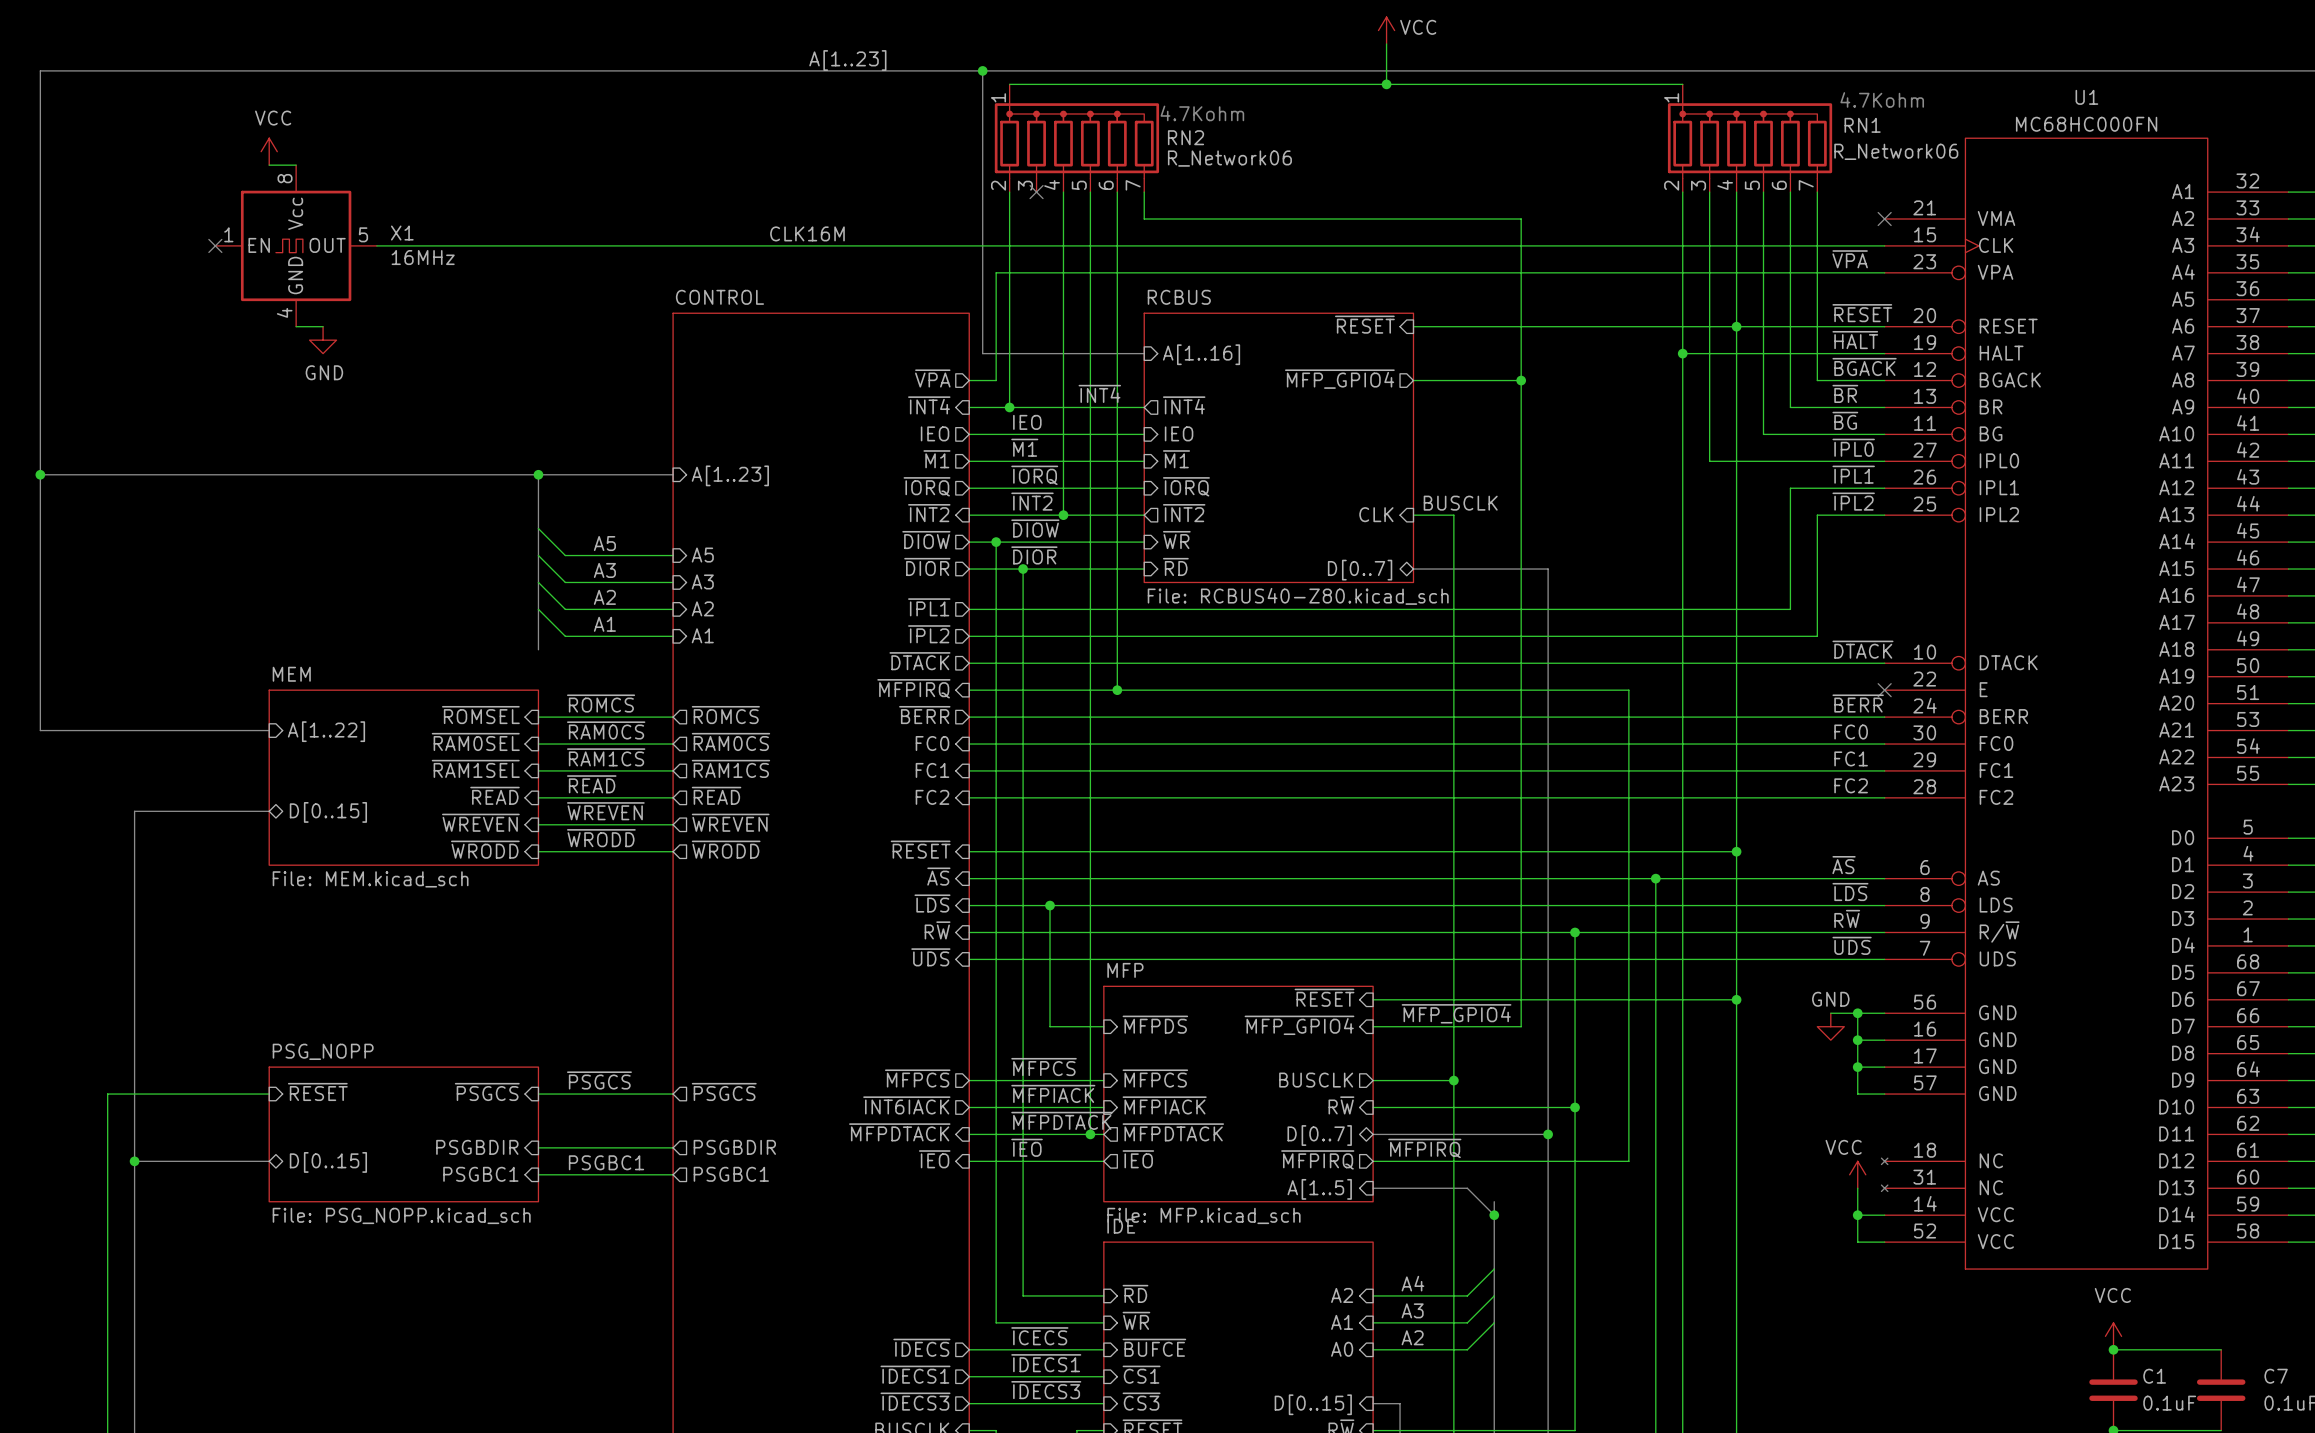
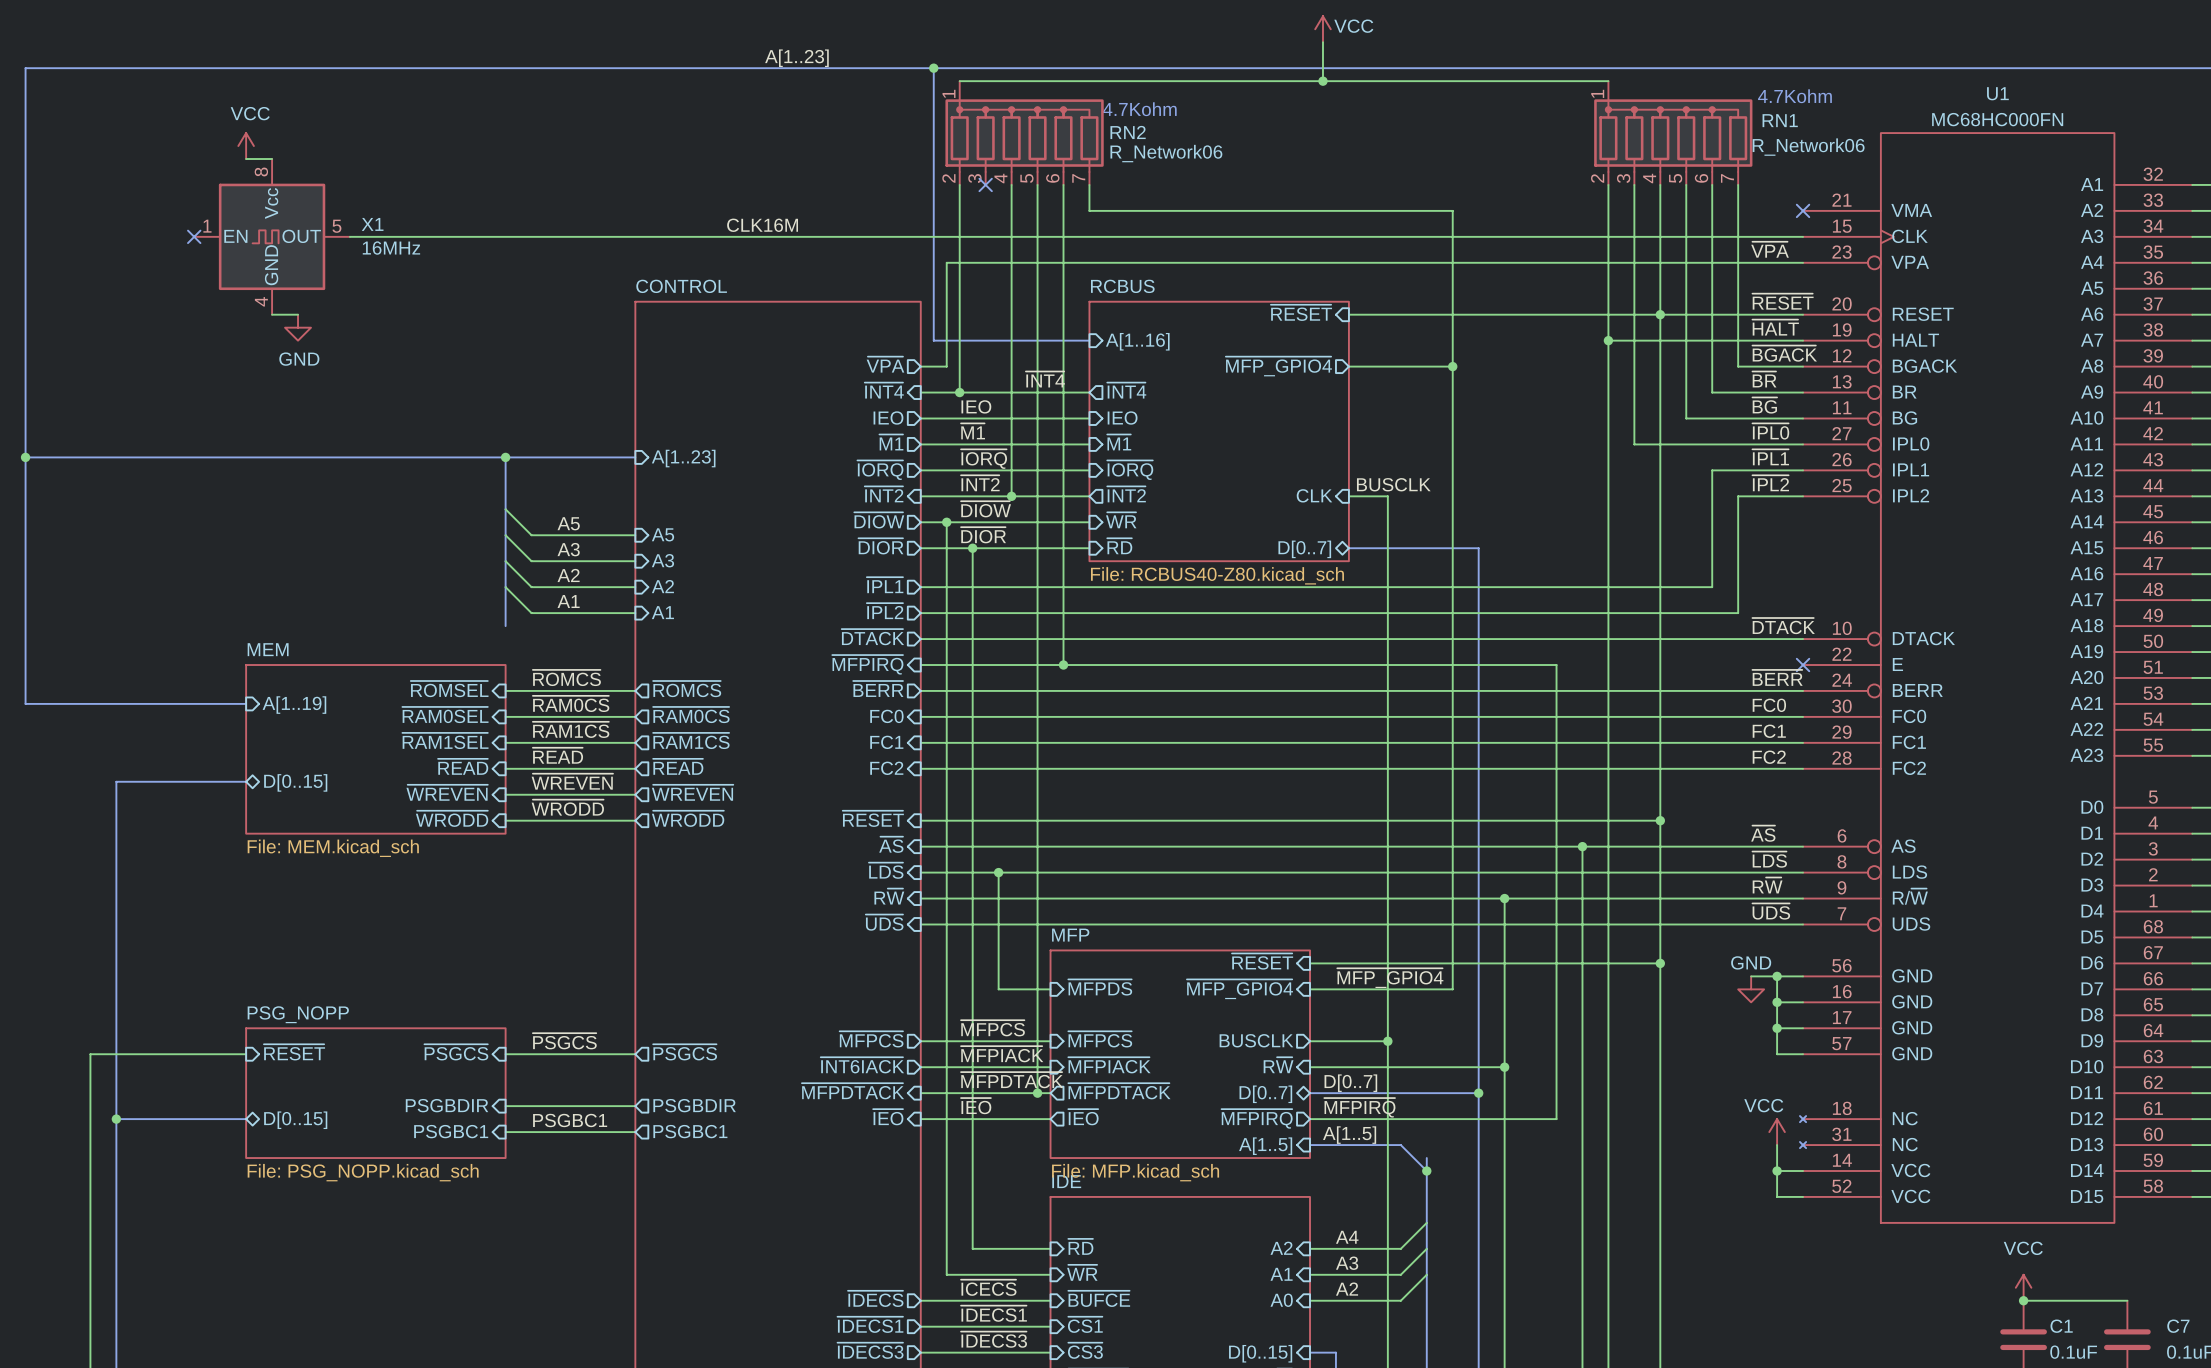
sheet pin: A[1..22] (326, 731) -> A[1..19] (294, 705)
label: none -> D[0..7] (1350, 1083)
label: none -> A[1..5] (1349, 1135)

